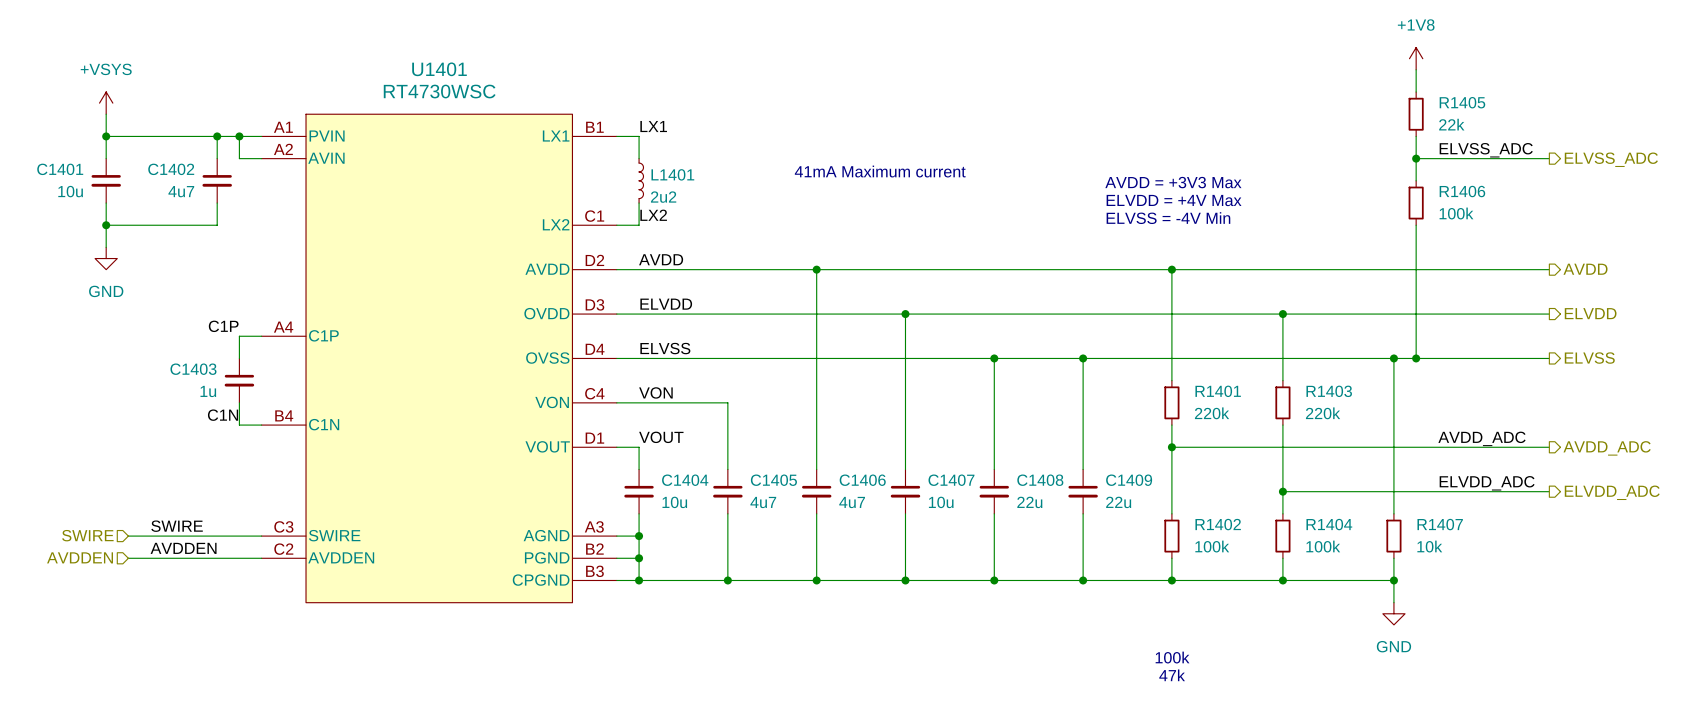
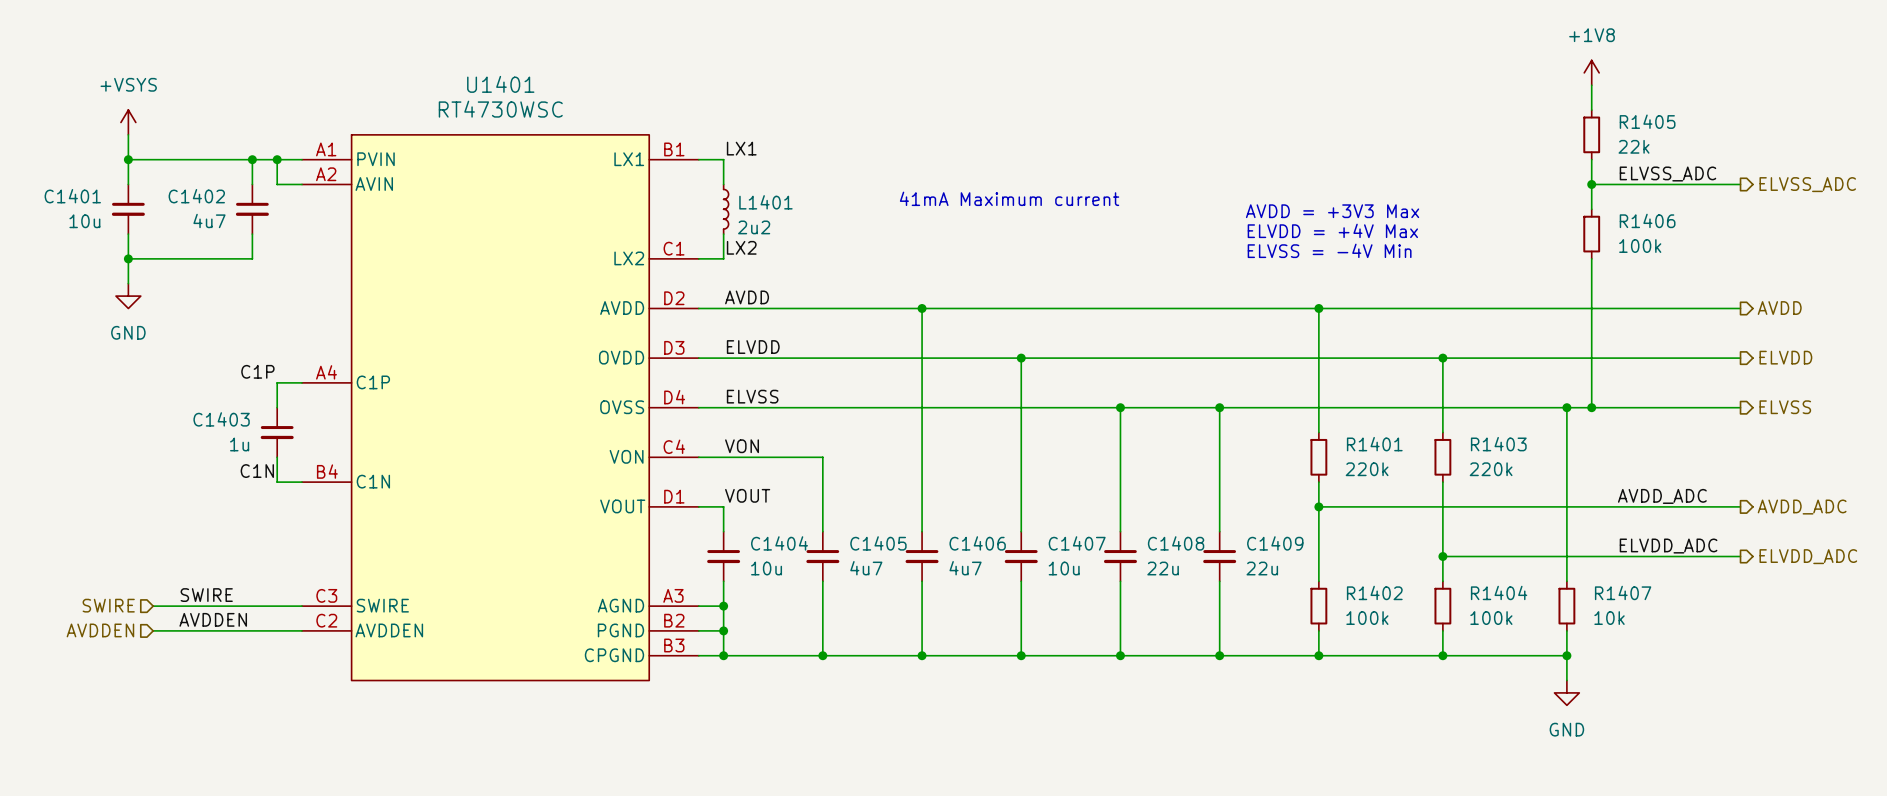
text: 100k (1172, 657) -> none
text: 47k (1172, 675) -> none

